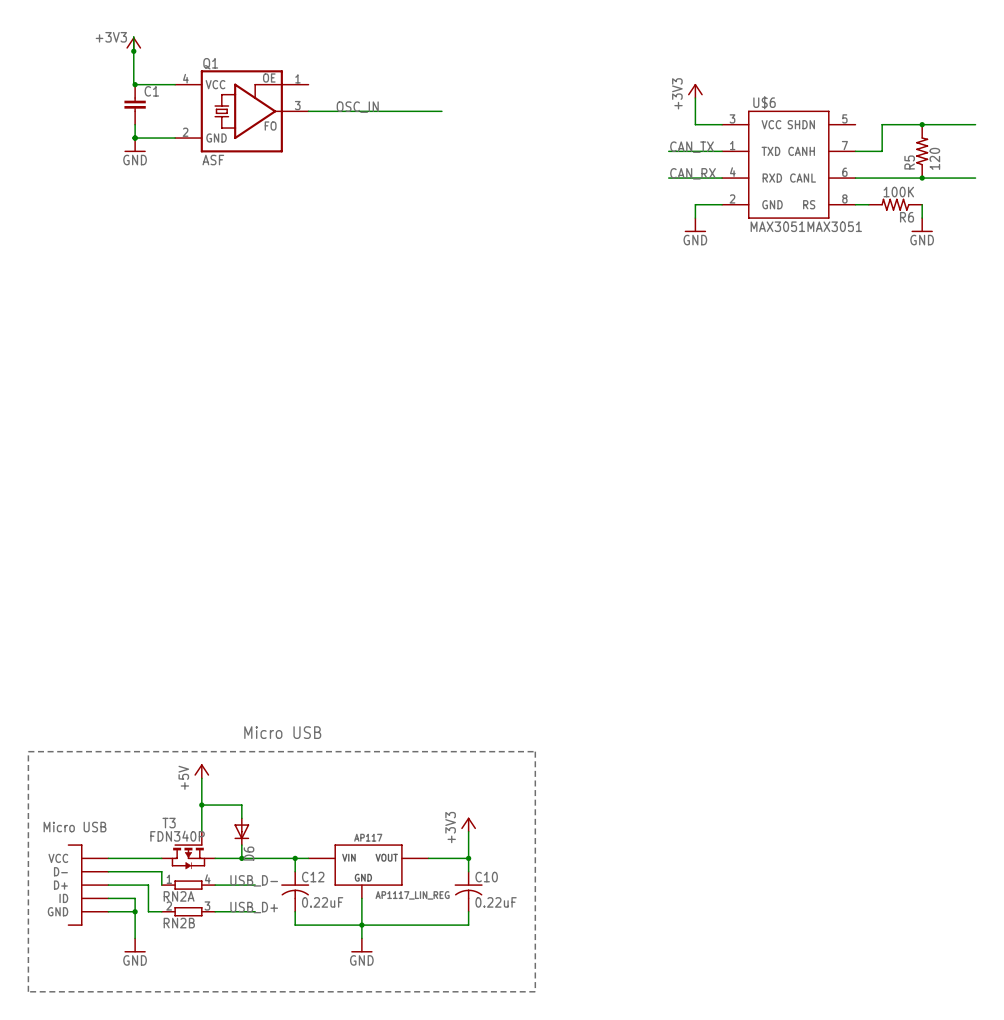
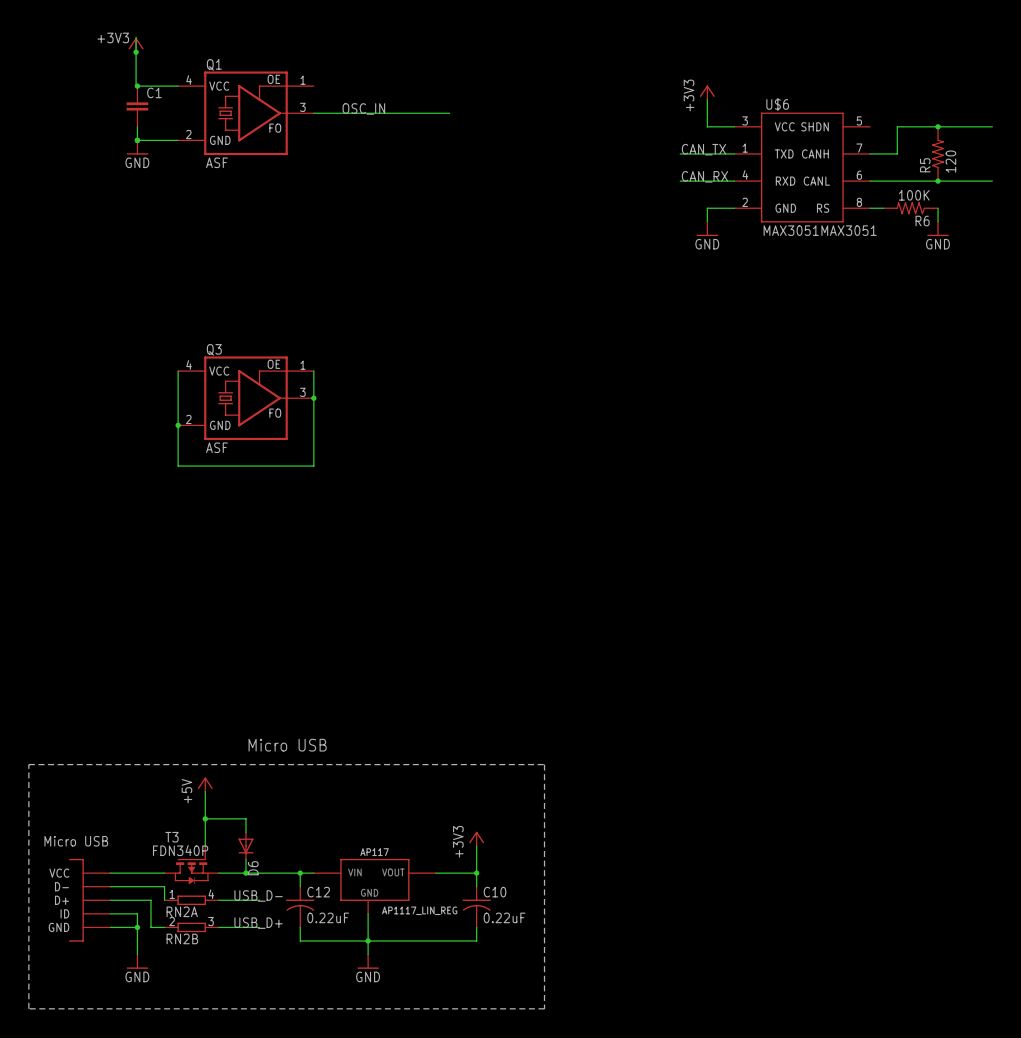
wire: none -> (178, 371) (178, 466) (313, 466) (313, 371)
Q3: none -> ASF (245, 398)
junction: none -> (313, 398)
junction: none -> (178, 425)

